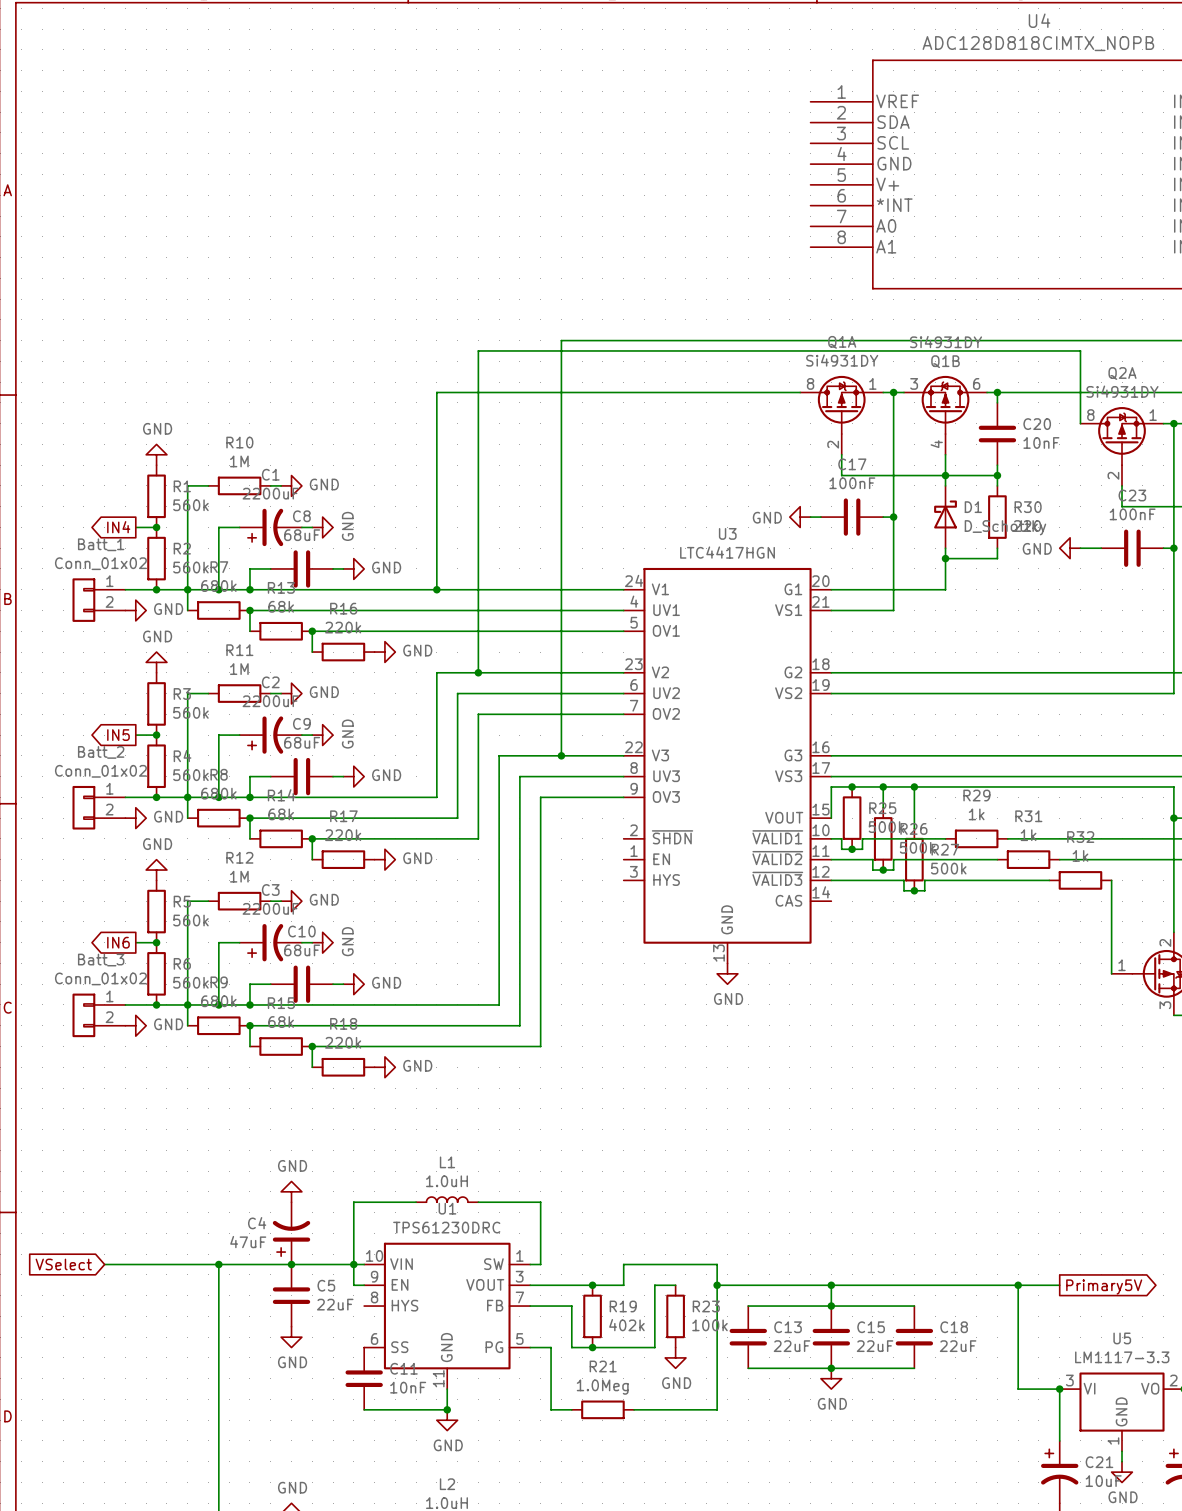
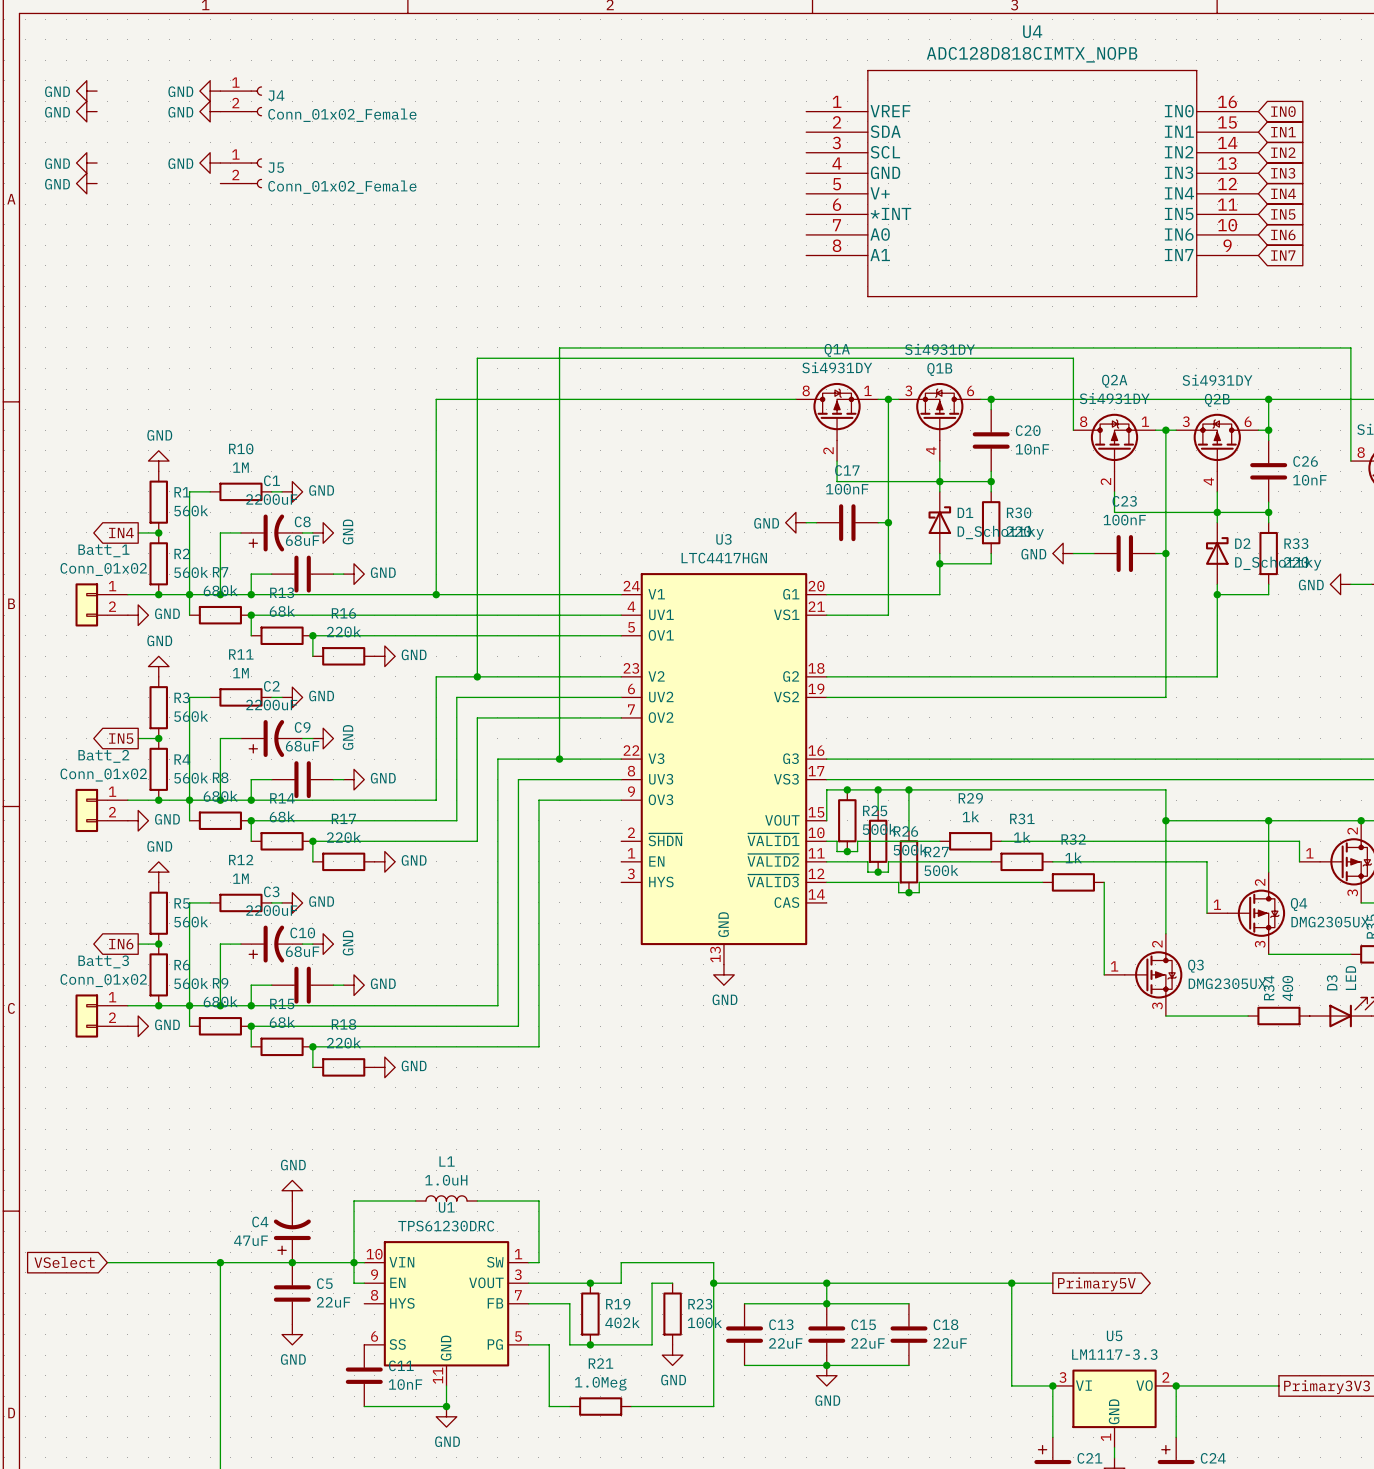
power symbol: none -> GND (86, 91)
power symbol: none -> GND (210, 91)
J4: none -> Conn_01x02_Female (241, 101)
power symbol: none -> GND (86, 111)
power symbol: none -> GND (210, 111)
power symbol: none -> GND (86, 163)
power symbol: none -> GND (210, 163)
J5: none -> Conn_01x02_Female (241, 173)
power symbol: none -> GND (86, 183)

